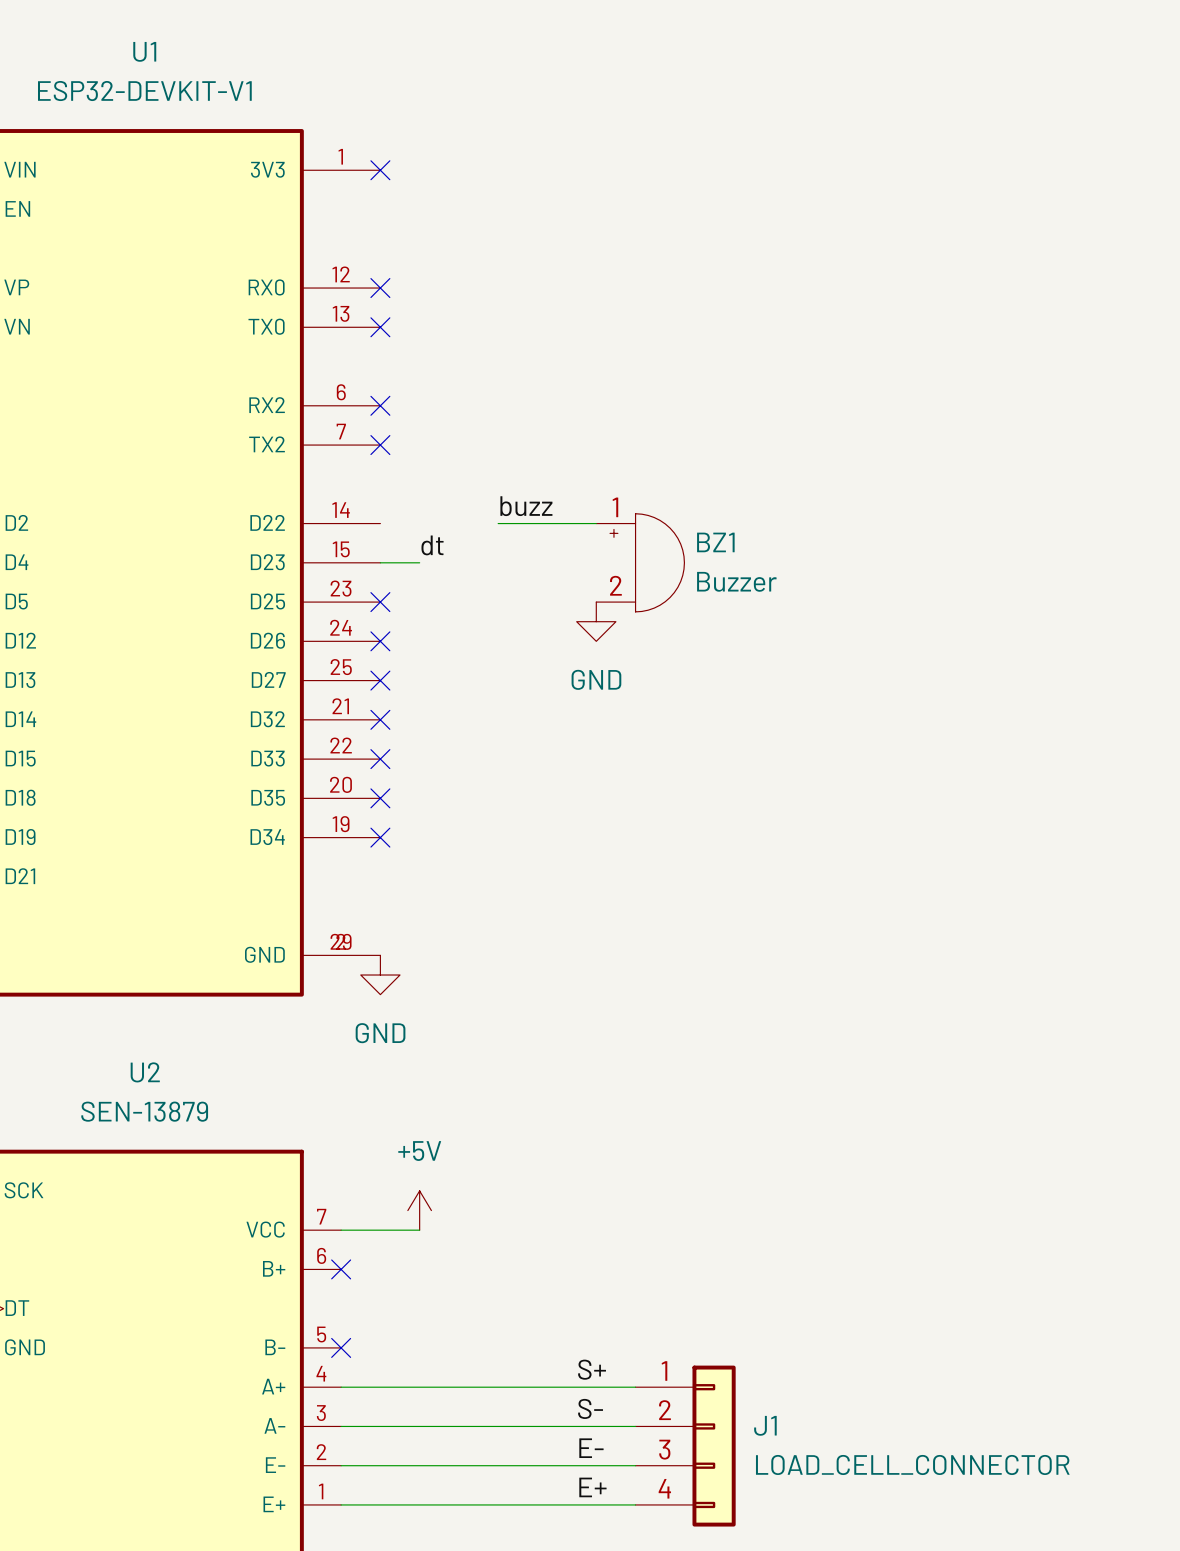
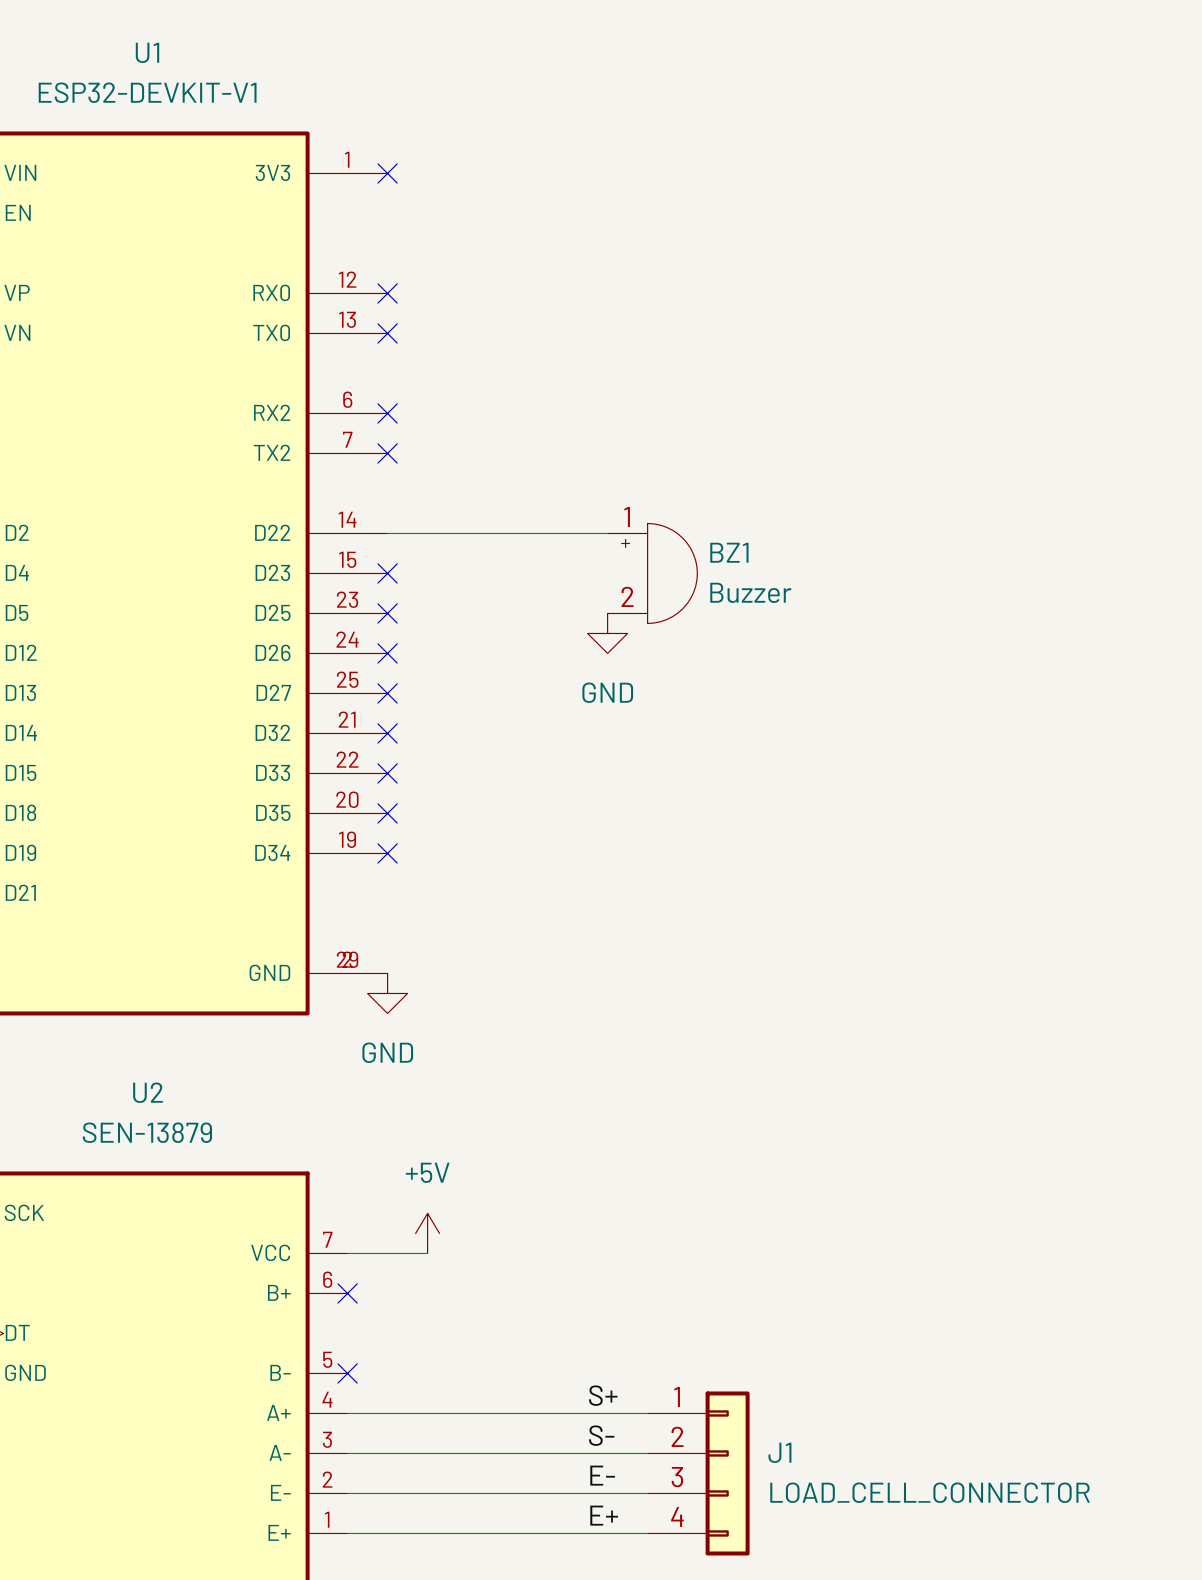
label: buzz (526, 506) -> none
wire: none -> (387, 533) (507, 533)
label: dt (432, 545) -> none
wire: (380, 562) (419, 562) -> none
no-connect mark: none -> (387, 573)

